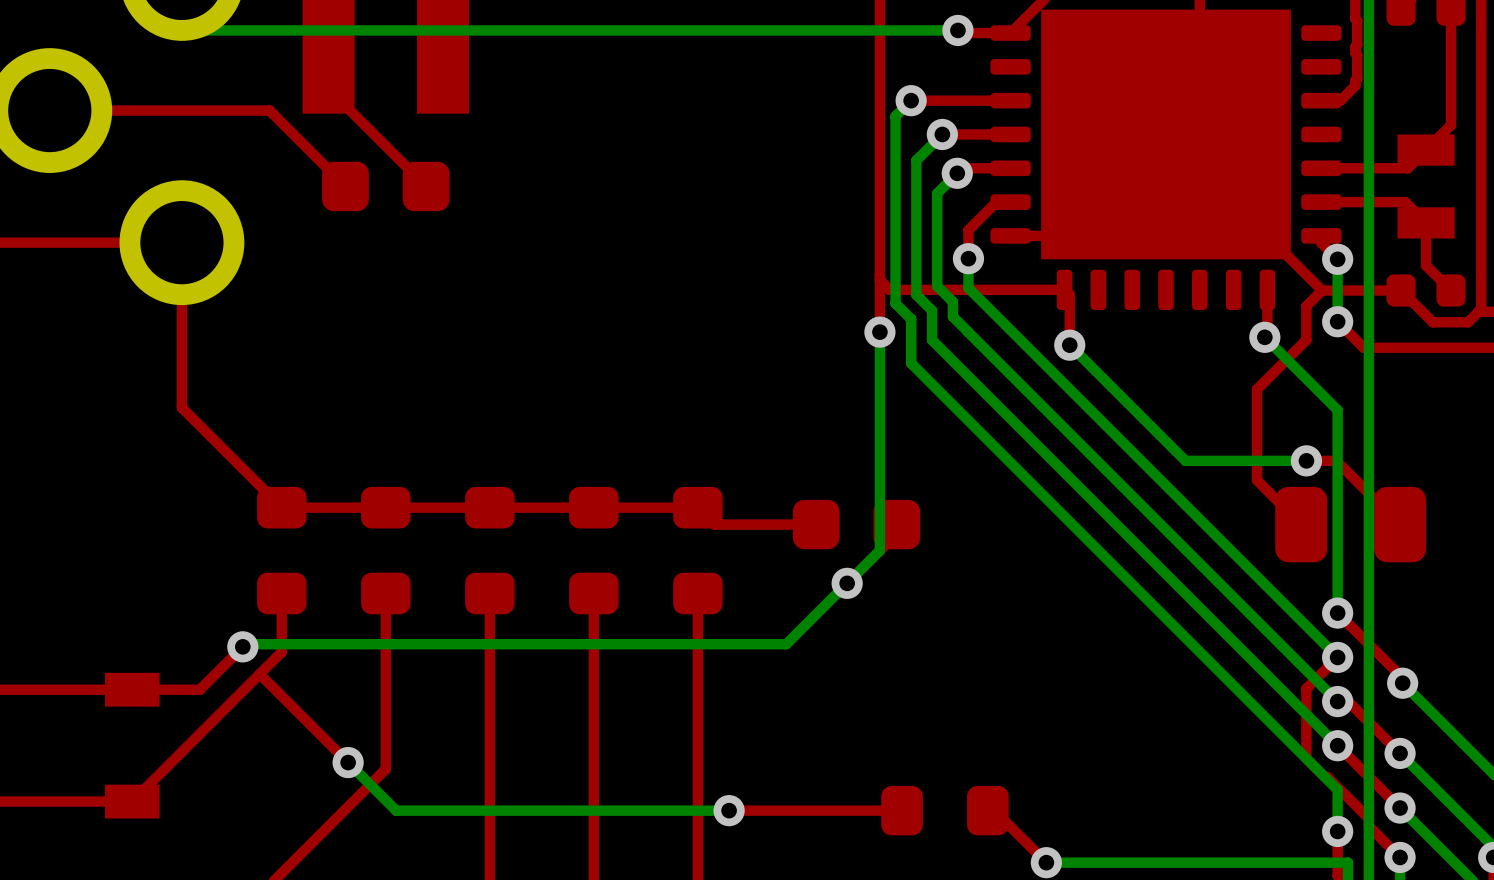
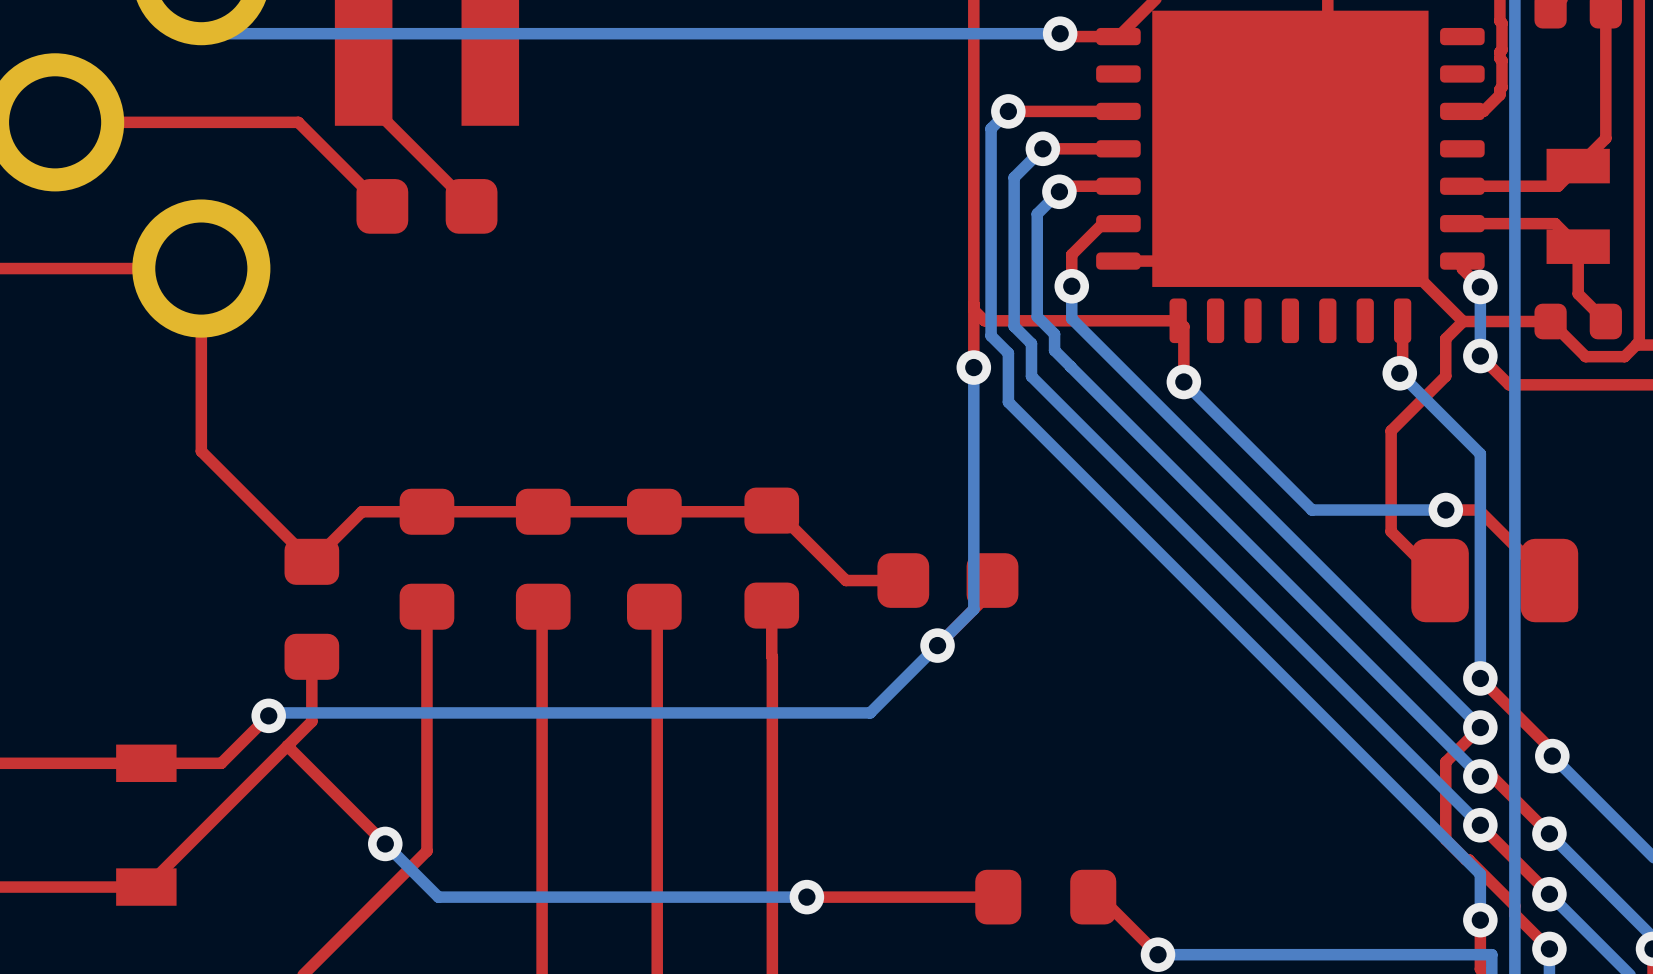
top track: (281, 507) (697, 507) (714, 524) (764, 524) -> (311, 561) (361, 511) (777, 511) (846, 580)
top track: none -> (771, 605) (771, 656)
top track: none -> (426, 606) (426, 656)
top track: none -> (543, 606) (542, 656)
top track: none -> (654, 606) (657, 609) (657, 656)
part position: (385, 550) -> (426, 559)
part position: (489, 550) -> (543, 559)
part position: (593, 550) -> (654, 559)
part position: (697, 550) -> (771, 558)

